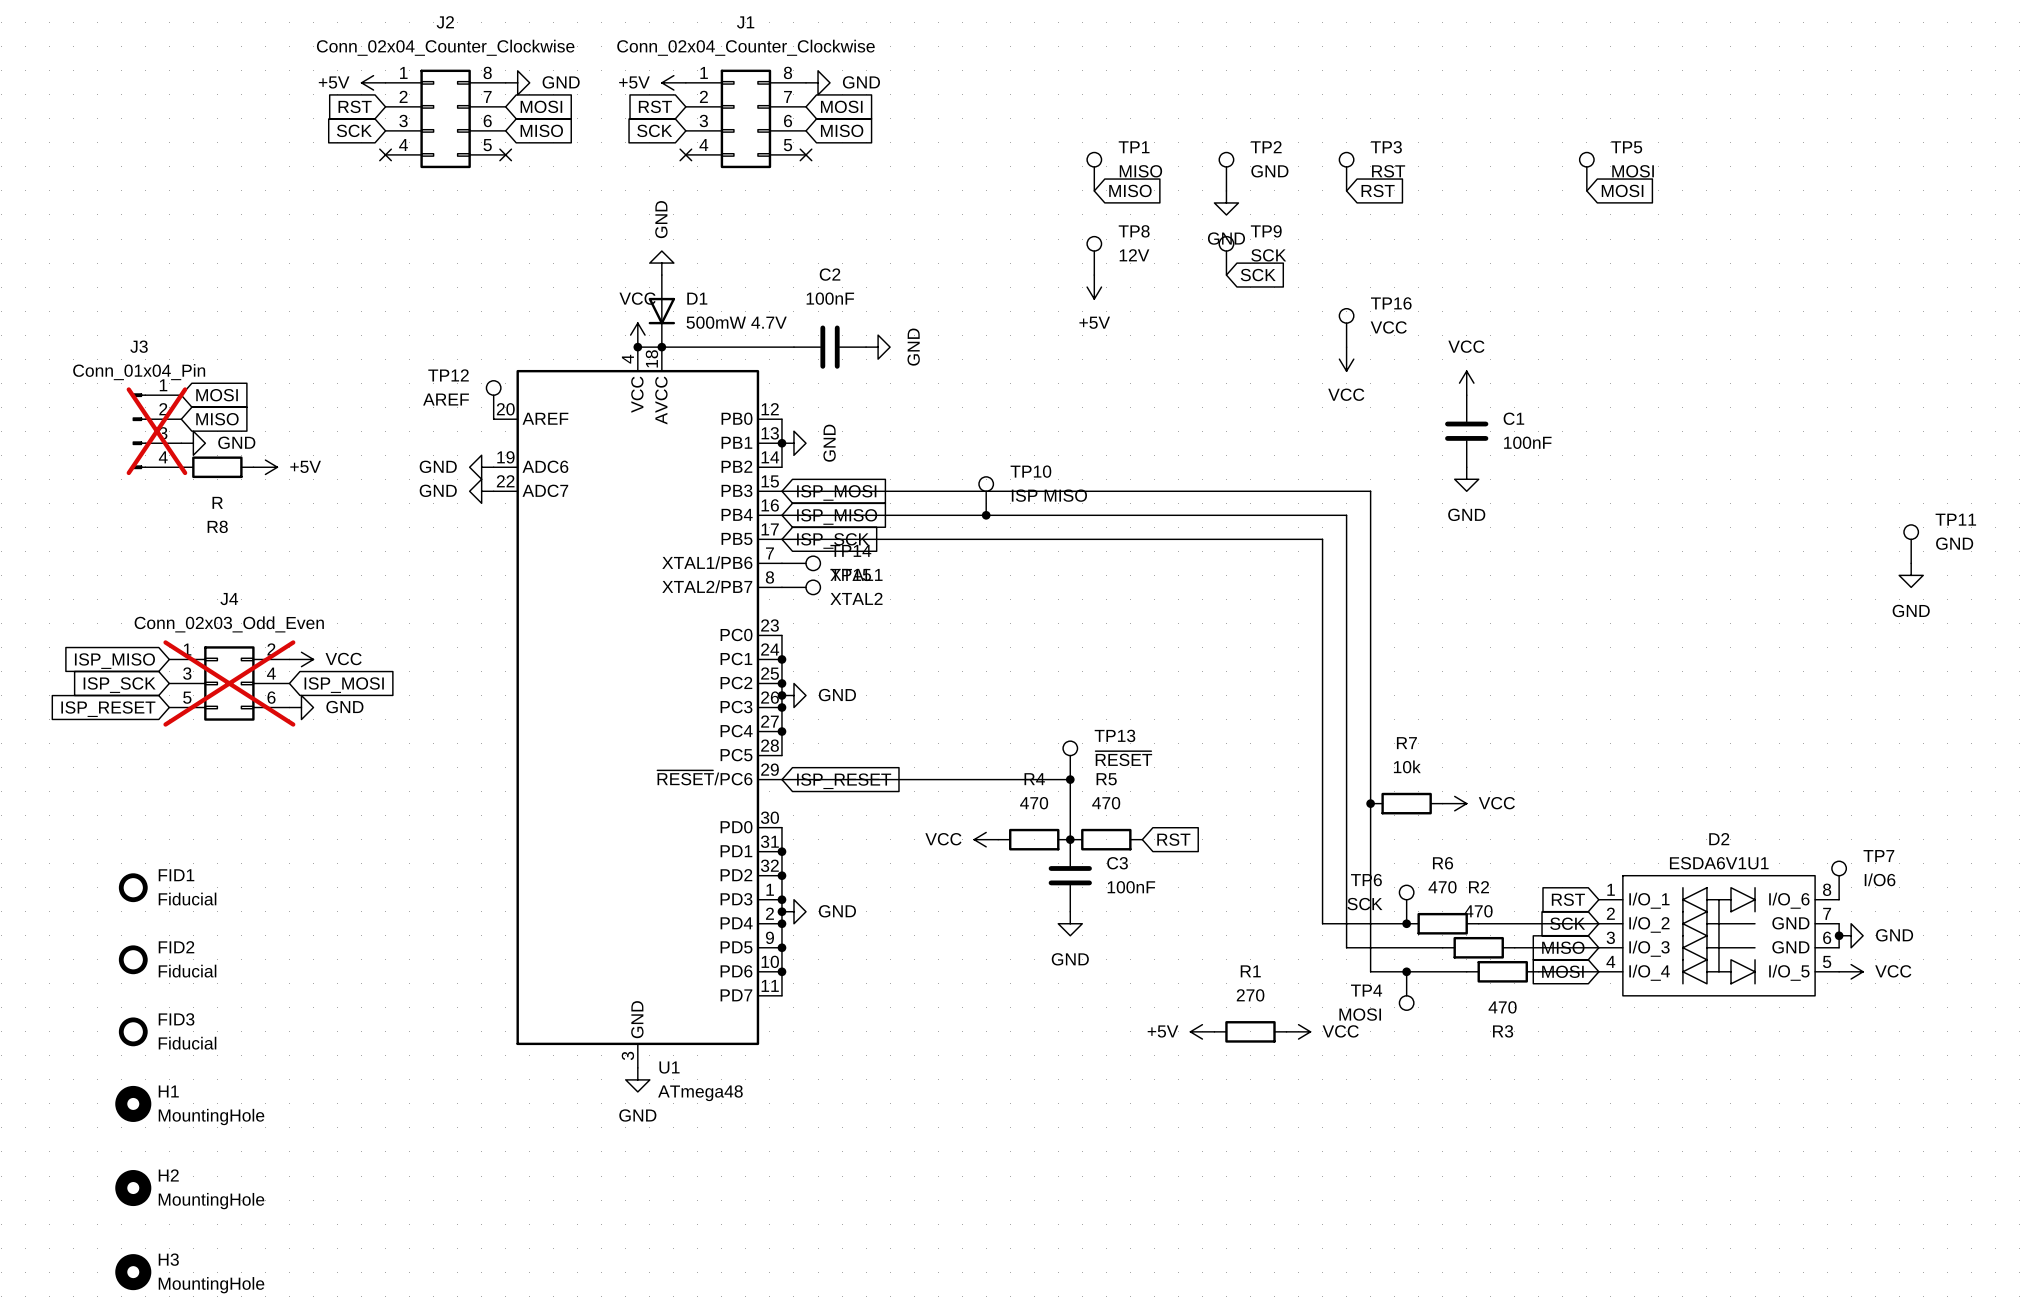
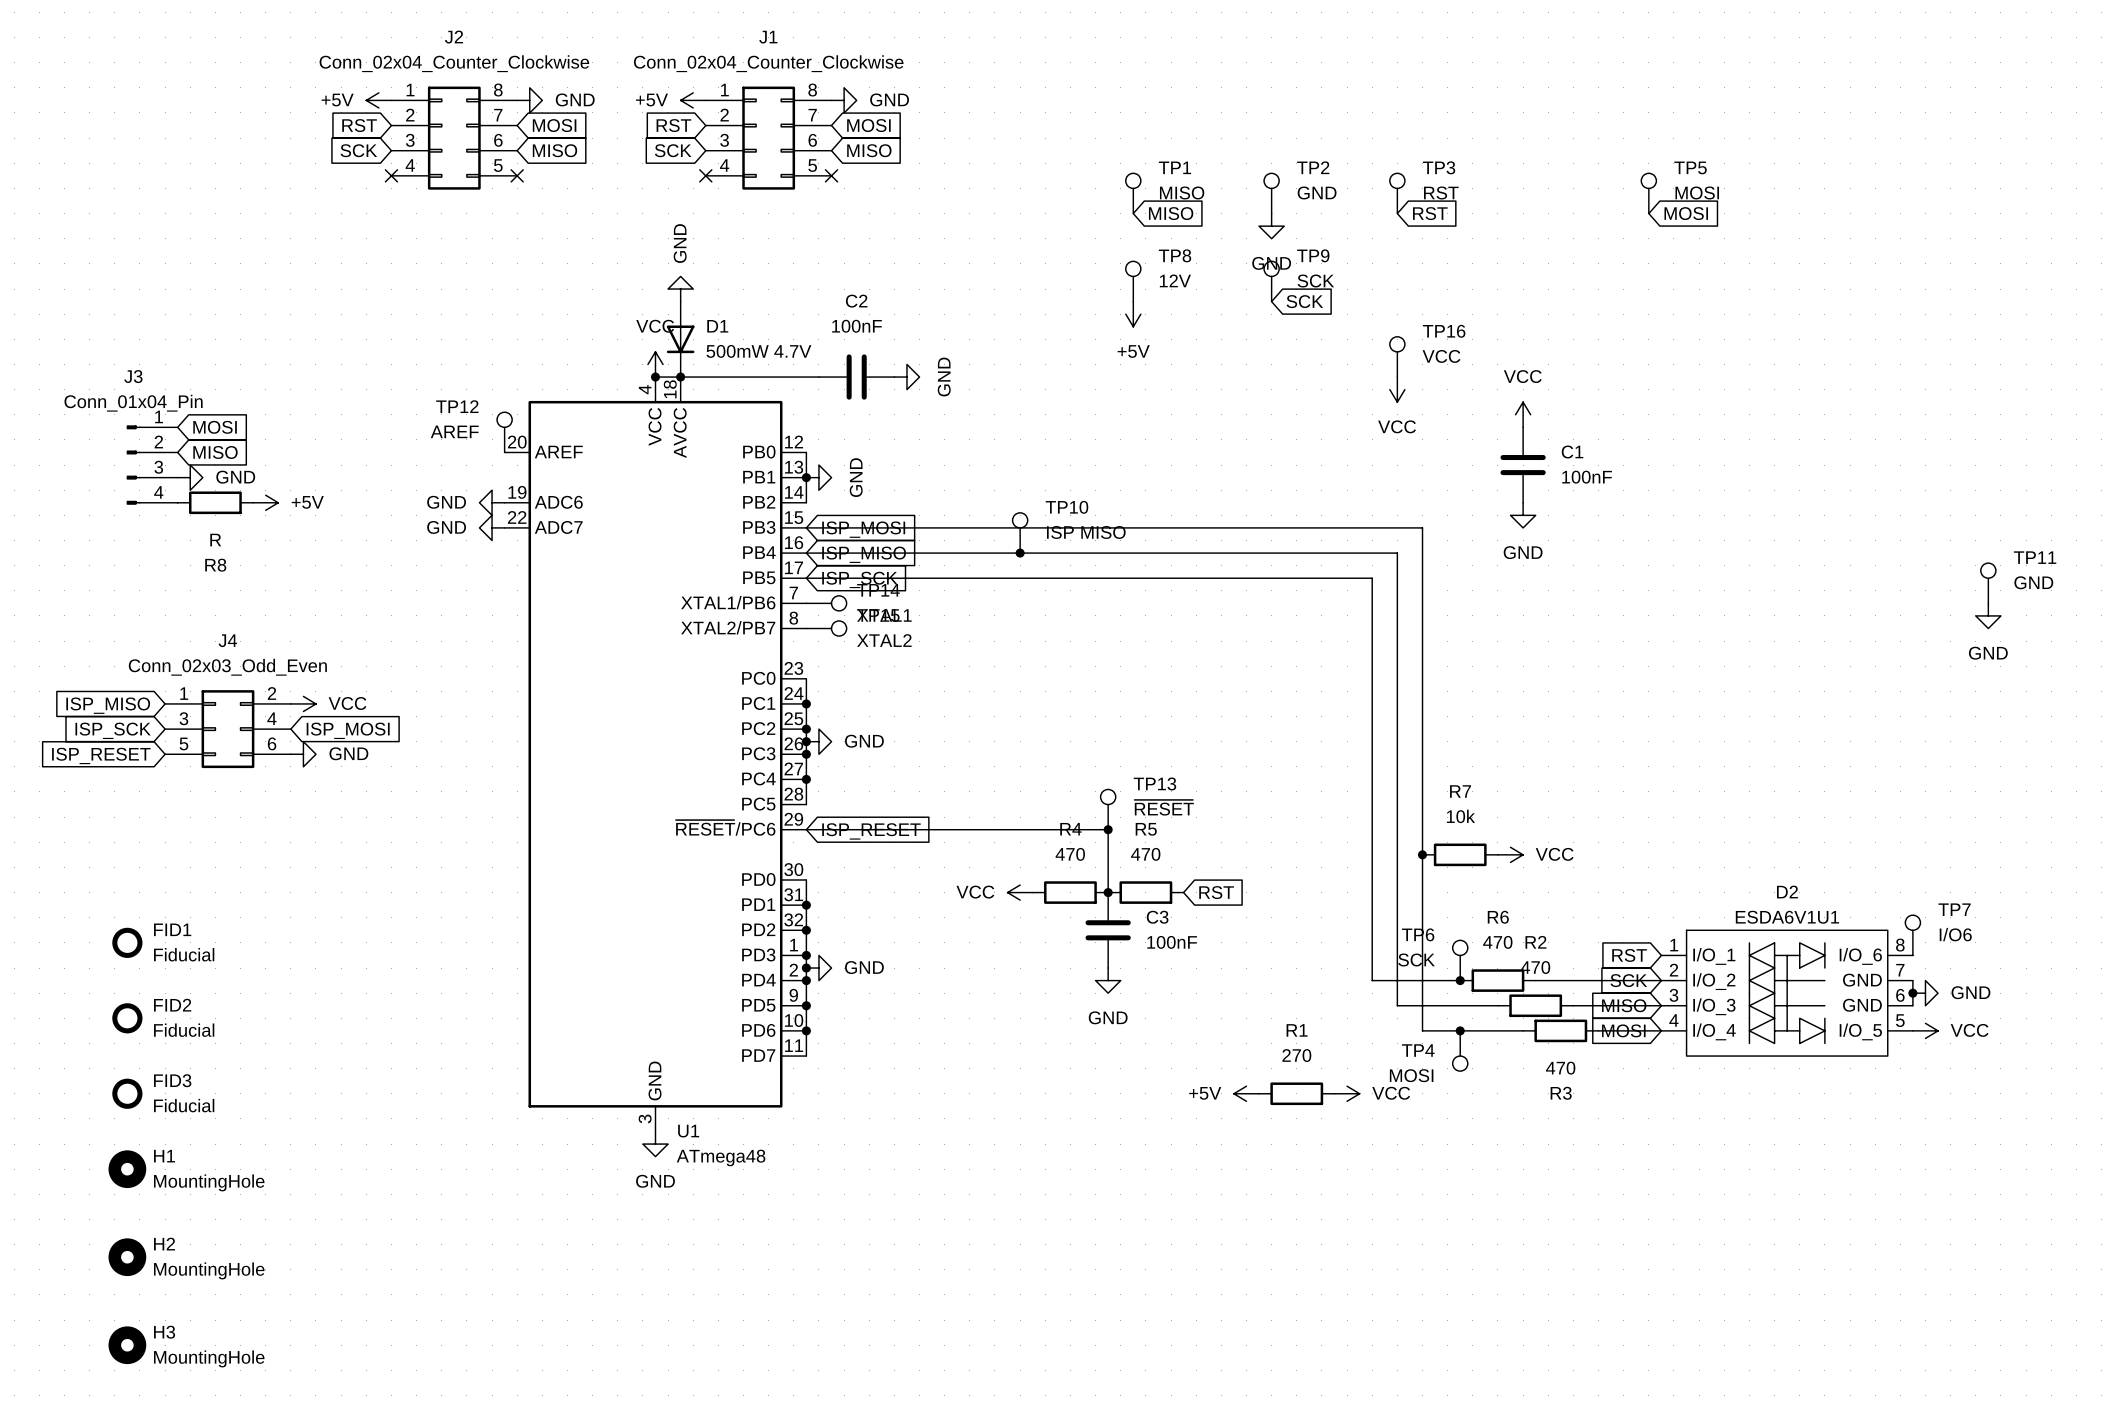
J3 do-not-place cross: (156, 431) -> none
J4 do-not-place cross: (229, 683) -> none

